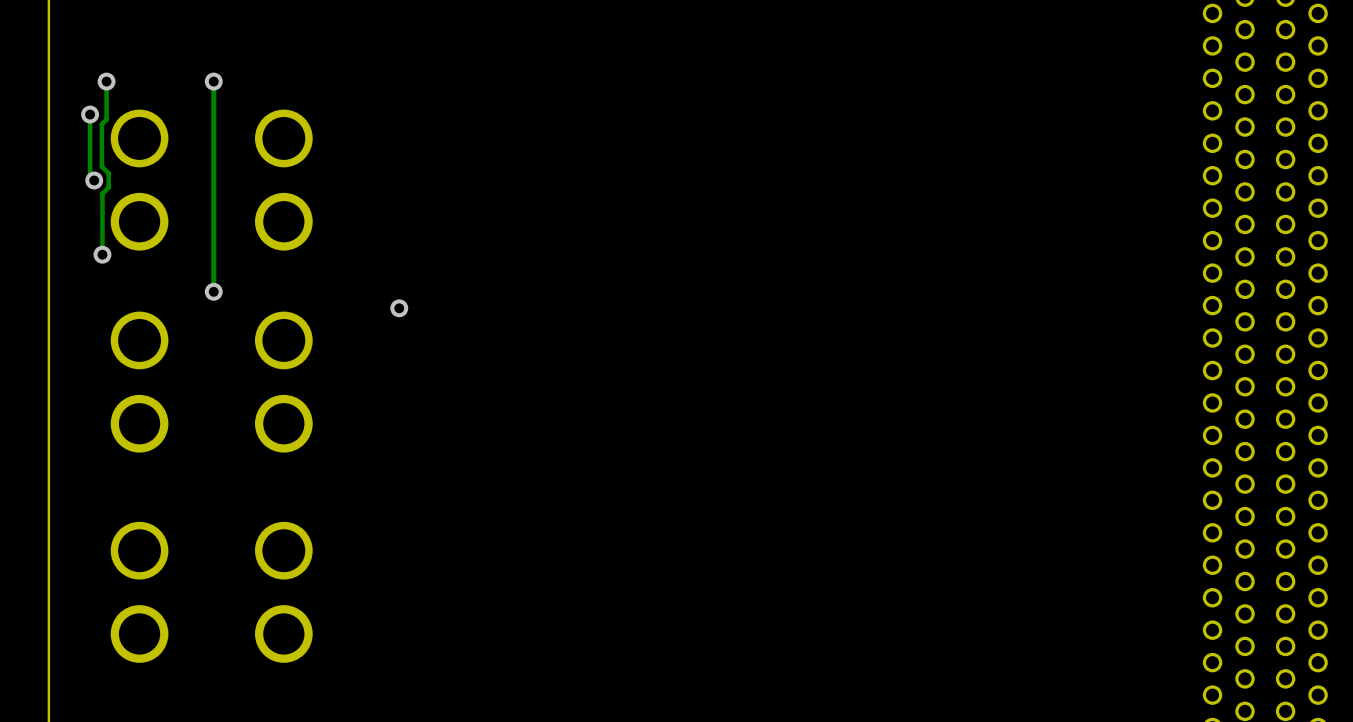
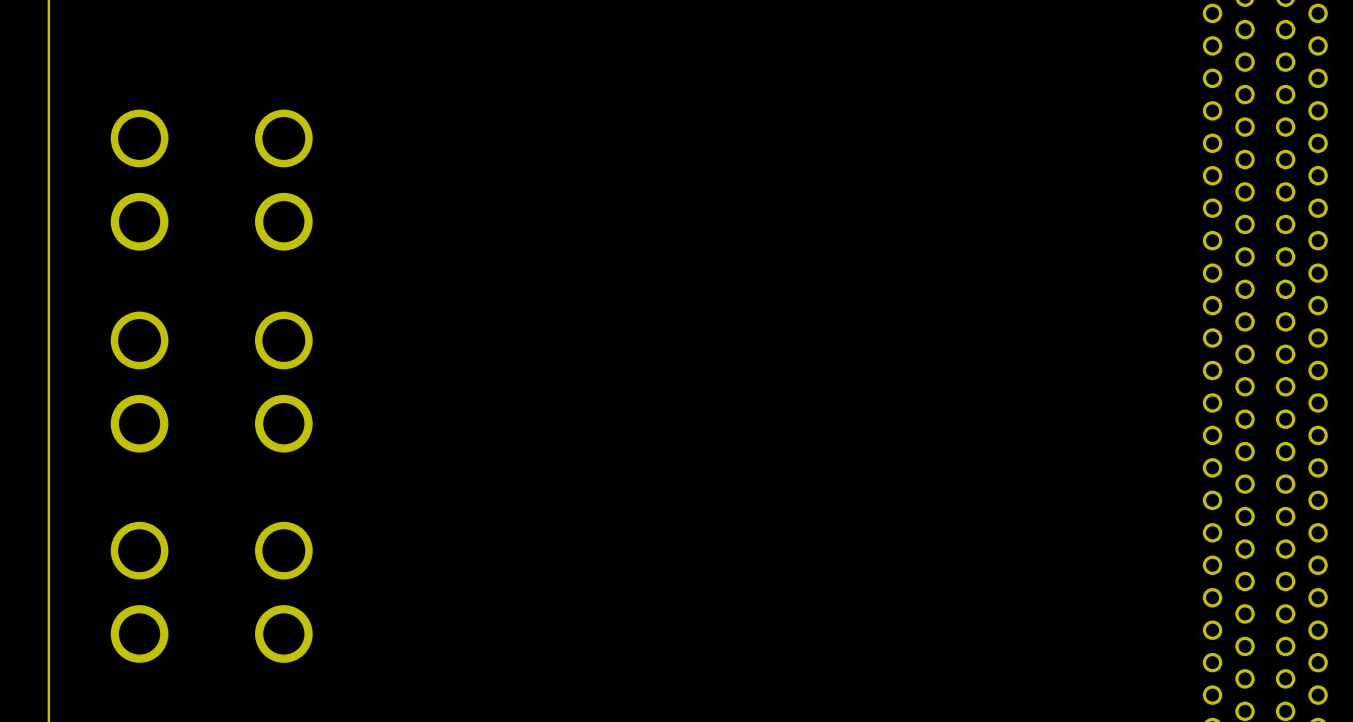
track: (106, 81) (106, 119) (101, 124) (101, 166) (108, 173) (108, 187) (102, 193) (102, 254) -> none
via: (106, 81) -> none
track: (213, 81) (213, 291) -> none
via: (213, 81) -> none
track: (90, 114) (90, 176) (94, 180) -> none
via: (90, 114) -> none
via: (94, 180) -> none
via: (102, 254) -> none
via: (213, 291) -> none
via: (399, 308) -> none

